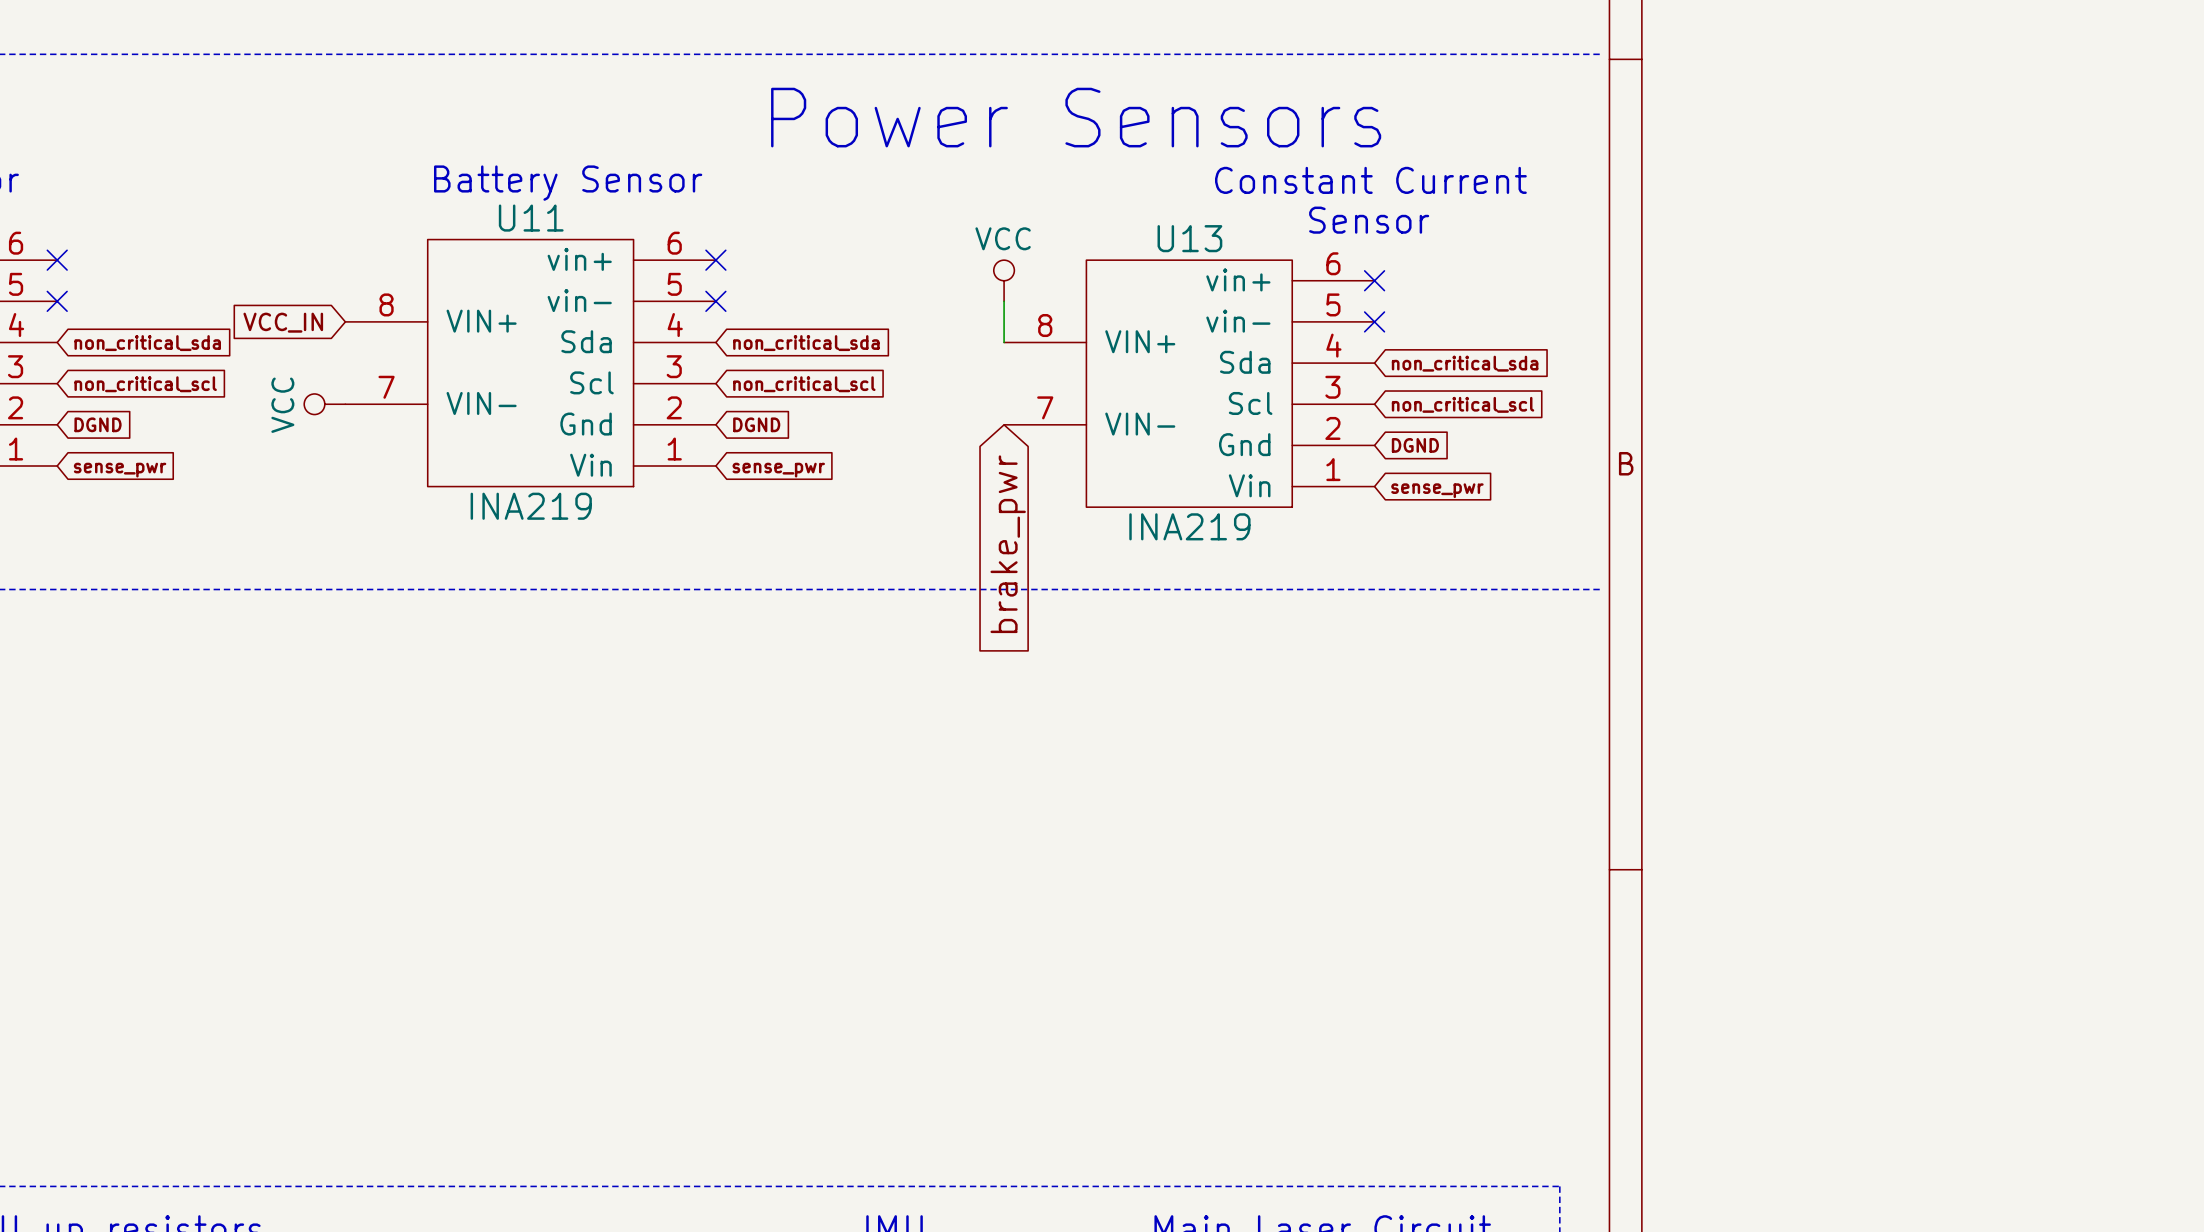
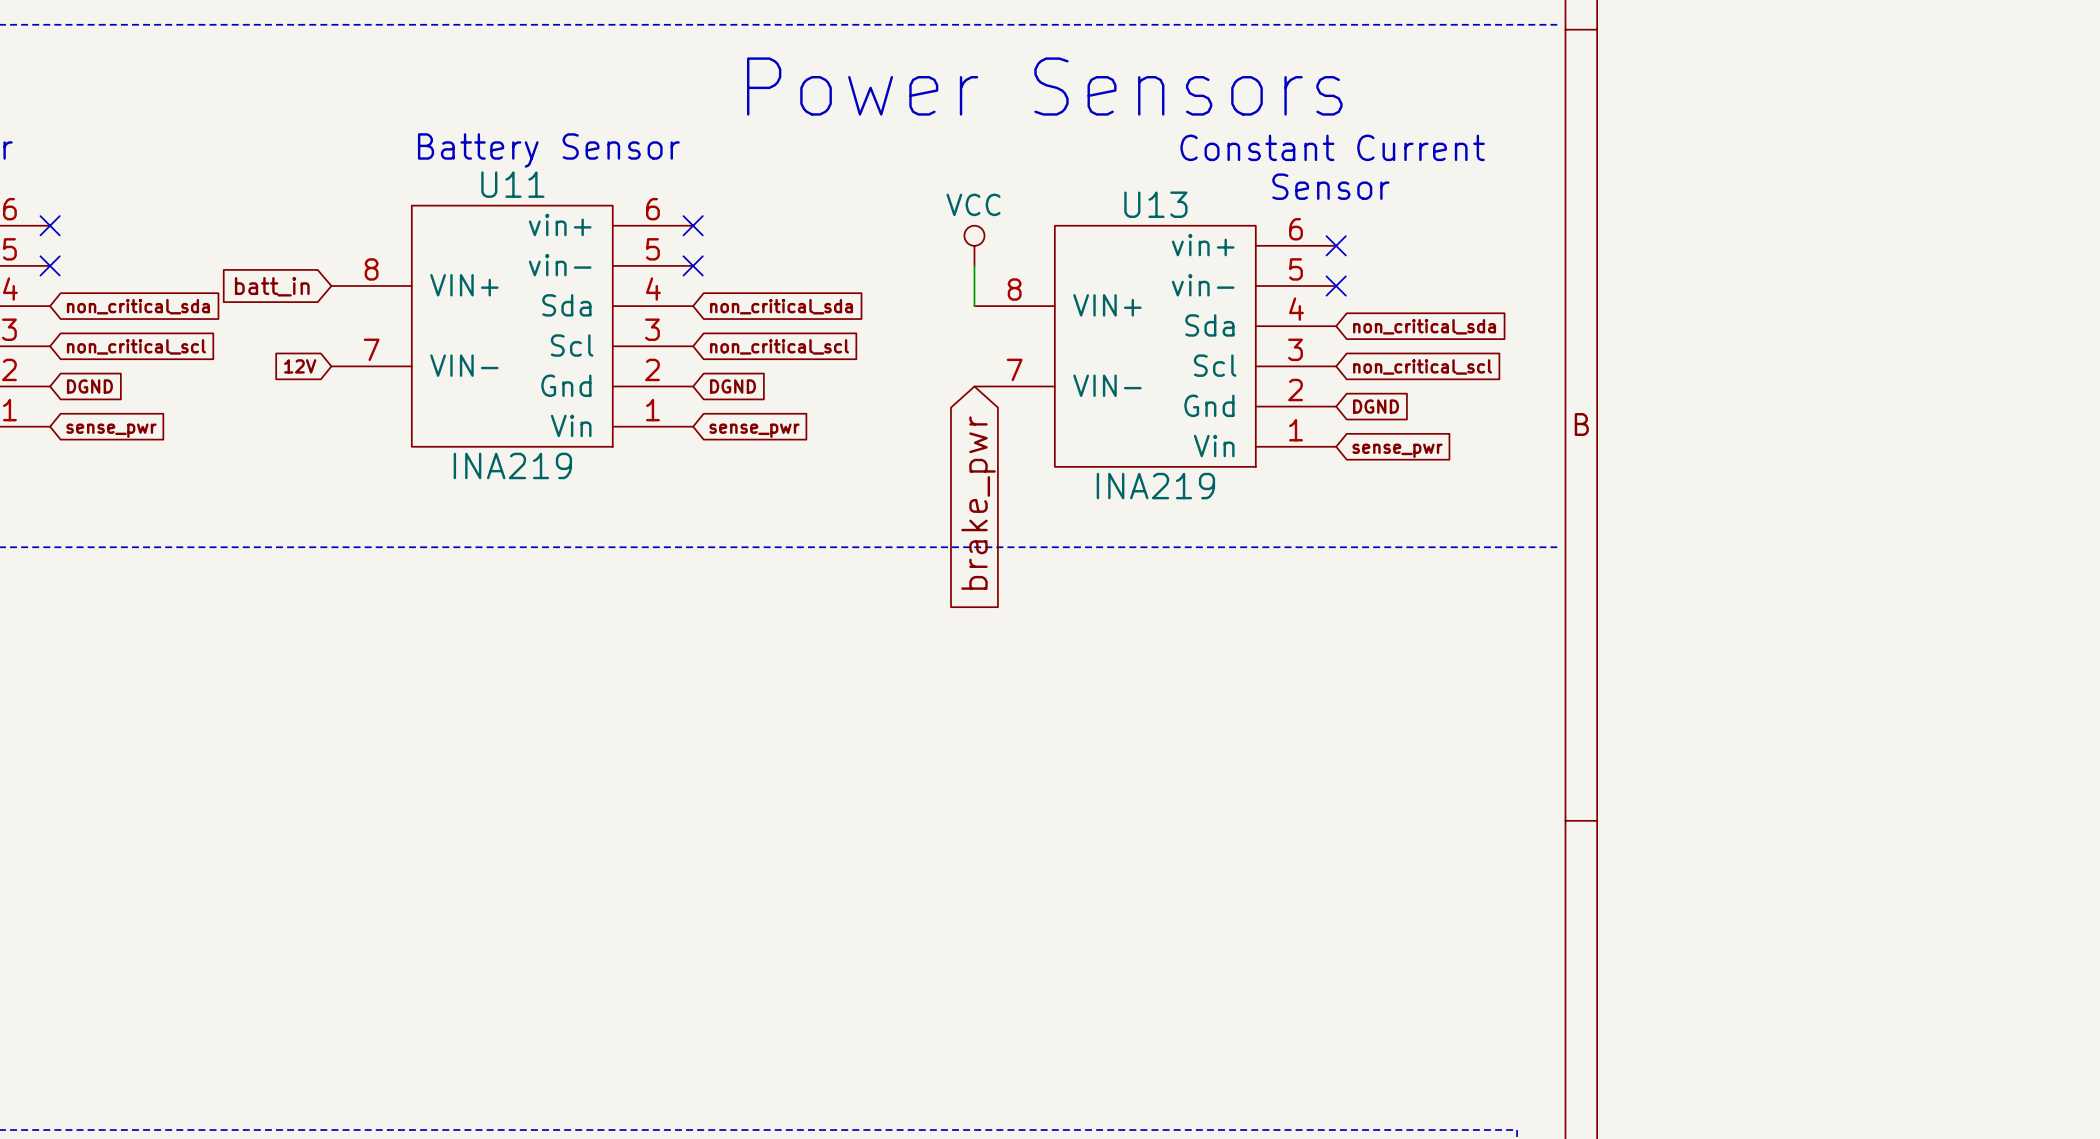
global label: VCC_IN (283, 322) -> batt_in (272, 286)
global label: none -> 12V (300, 366)
power symbol: VCC (324, 404) -> none

